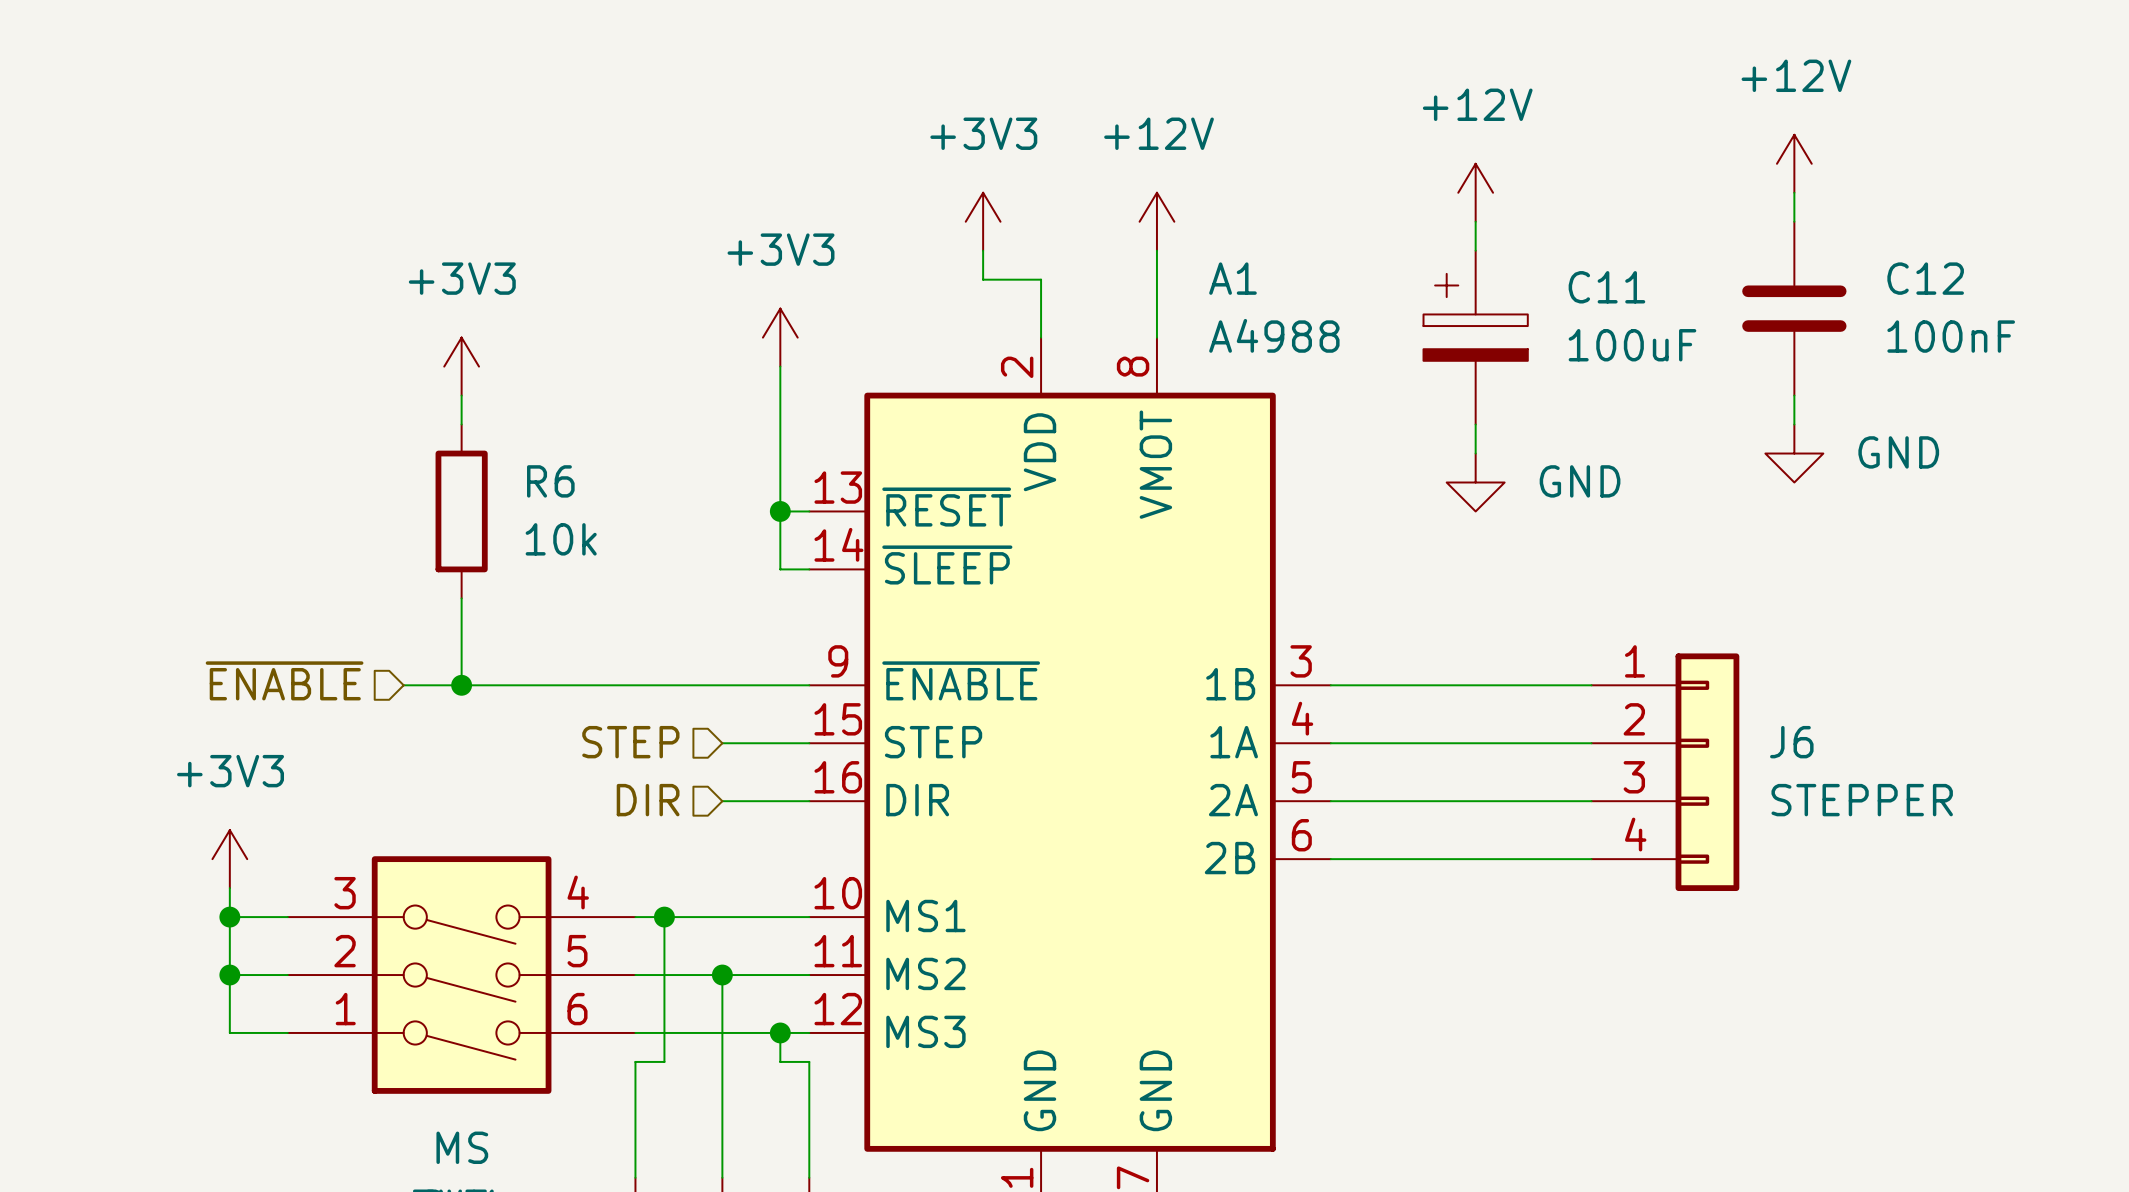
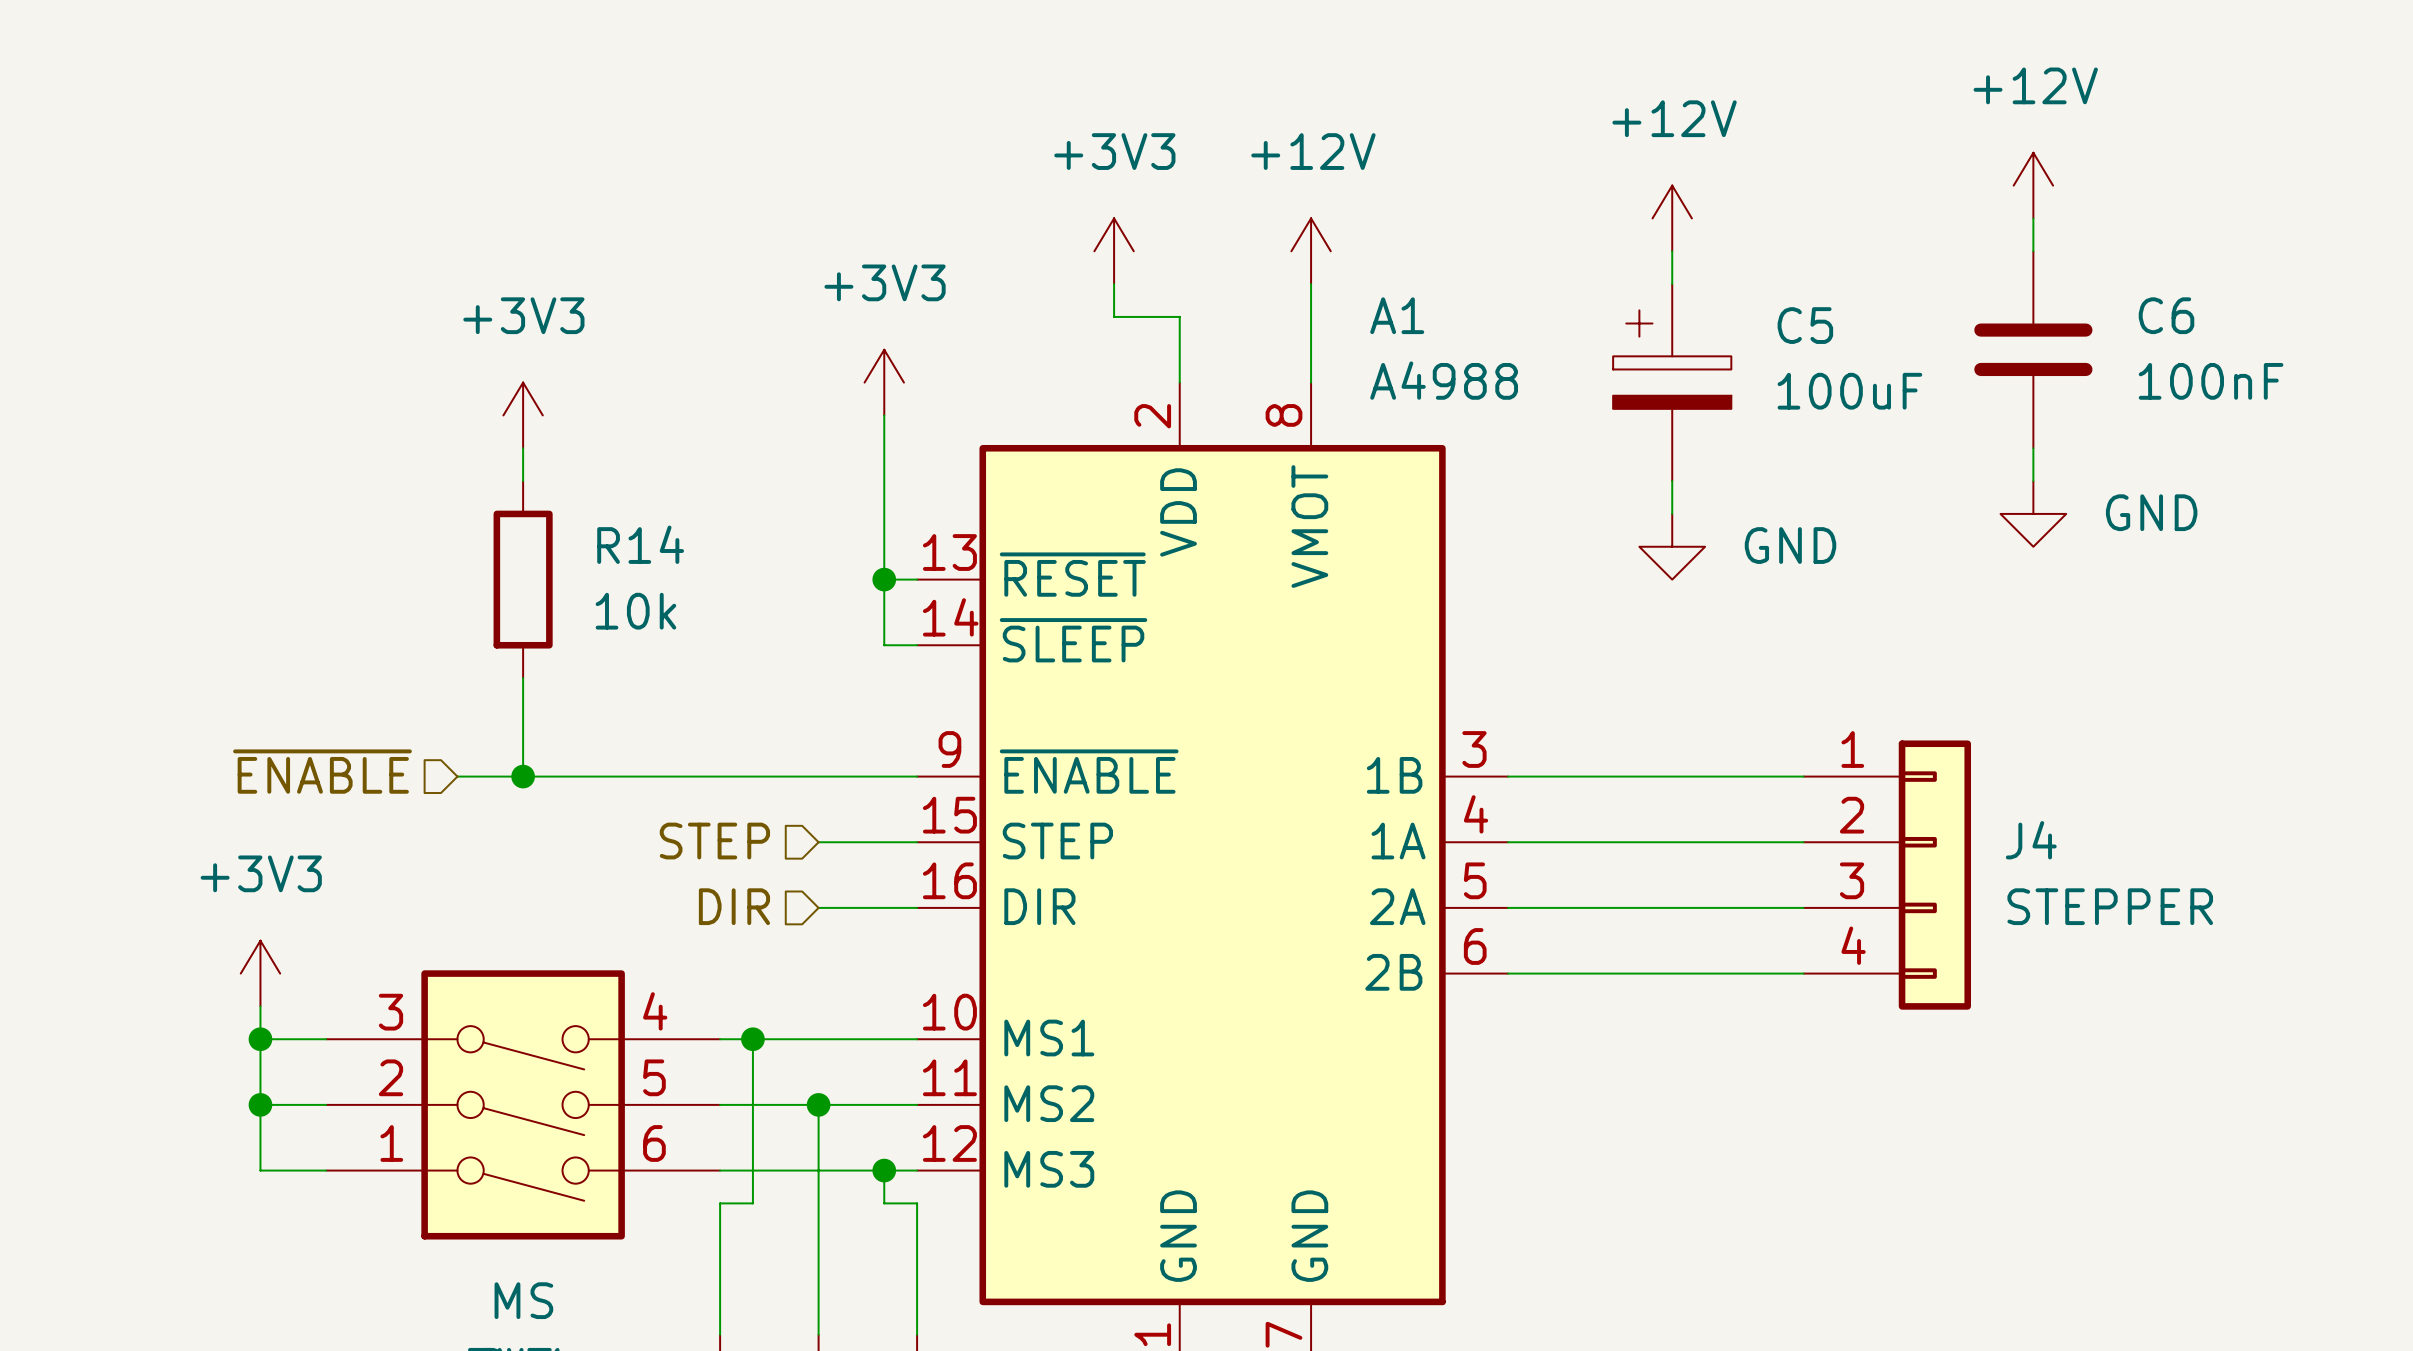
C12 name: C12 (1925, 278) -> C6 (2166, 315)
C11 name: C11 (1606, 287) -> C5 (1805, 325)
R6 name: R6 (550, 481) -> R14 (640, 544)
J6 name: J6 (1791, 742) -> J4 (2031, 840)

